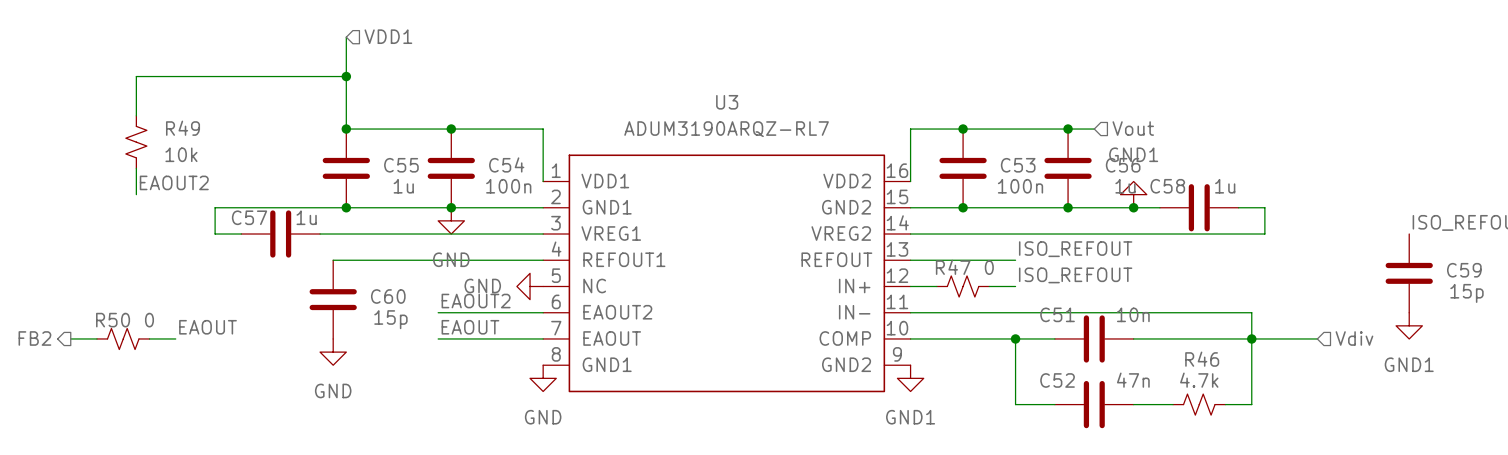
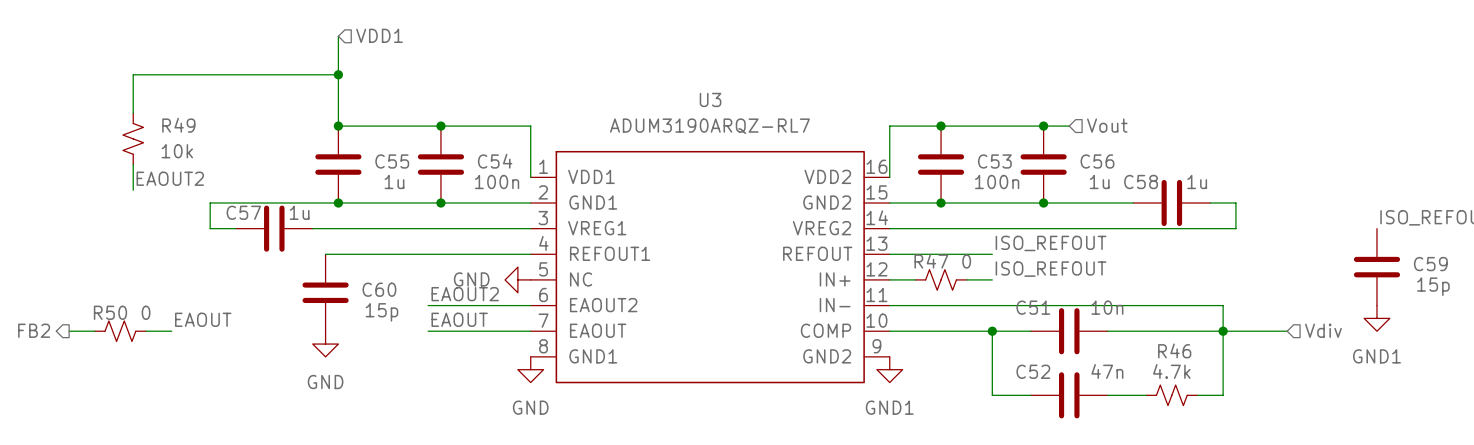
power symbol: GND1 (1133, 194) -> none
junction: (1133, 207) -> none
power symbol: GND (451, 220) -> none

